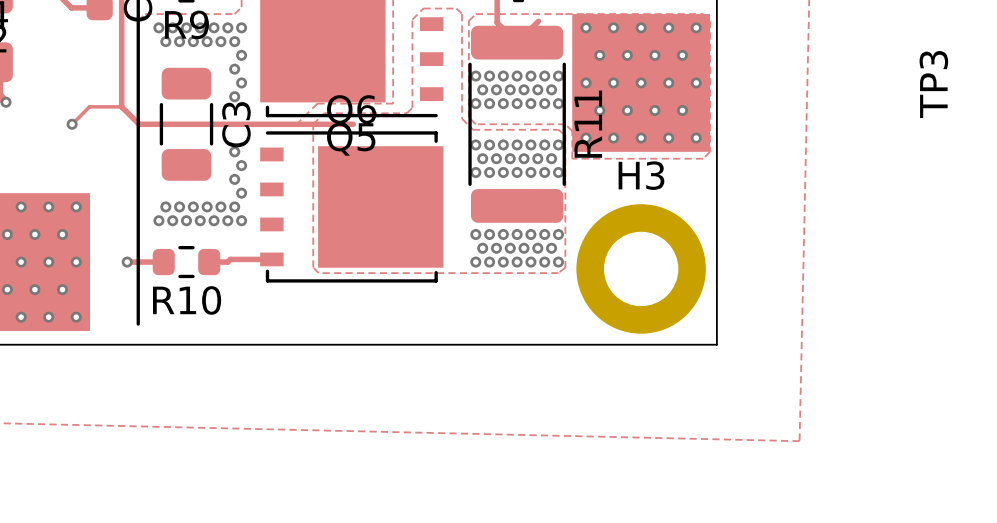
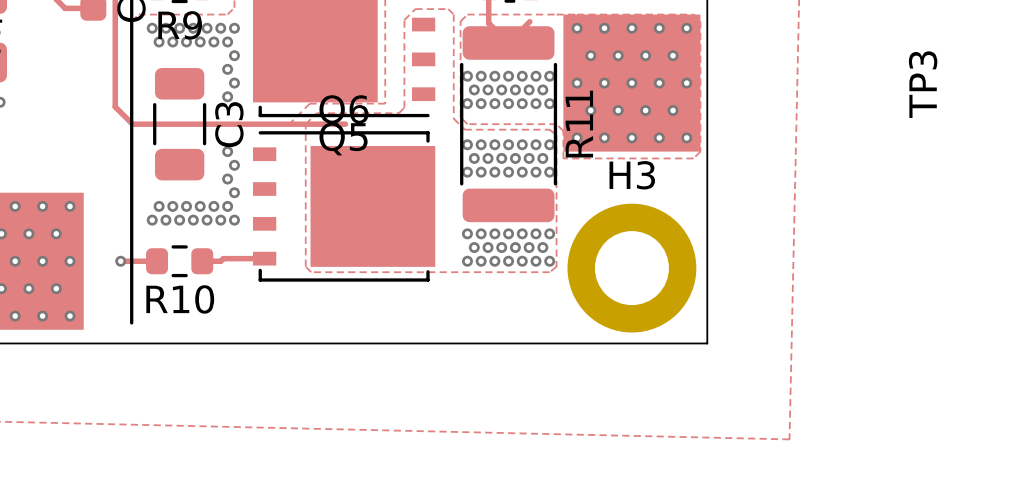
track: (121, 106) (89, 106) (72, 124) -> none
via: (72, 124) -> none

